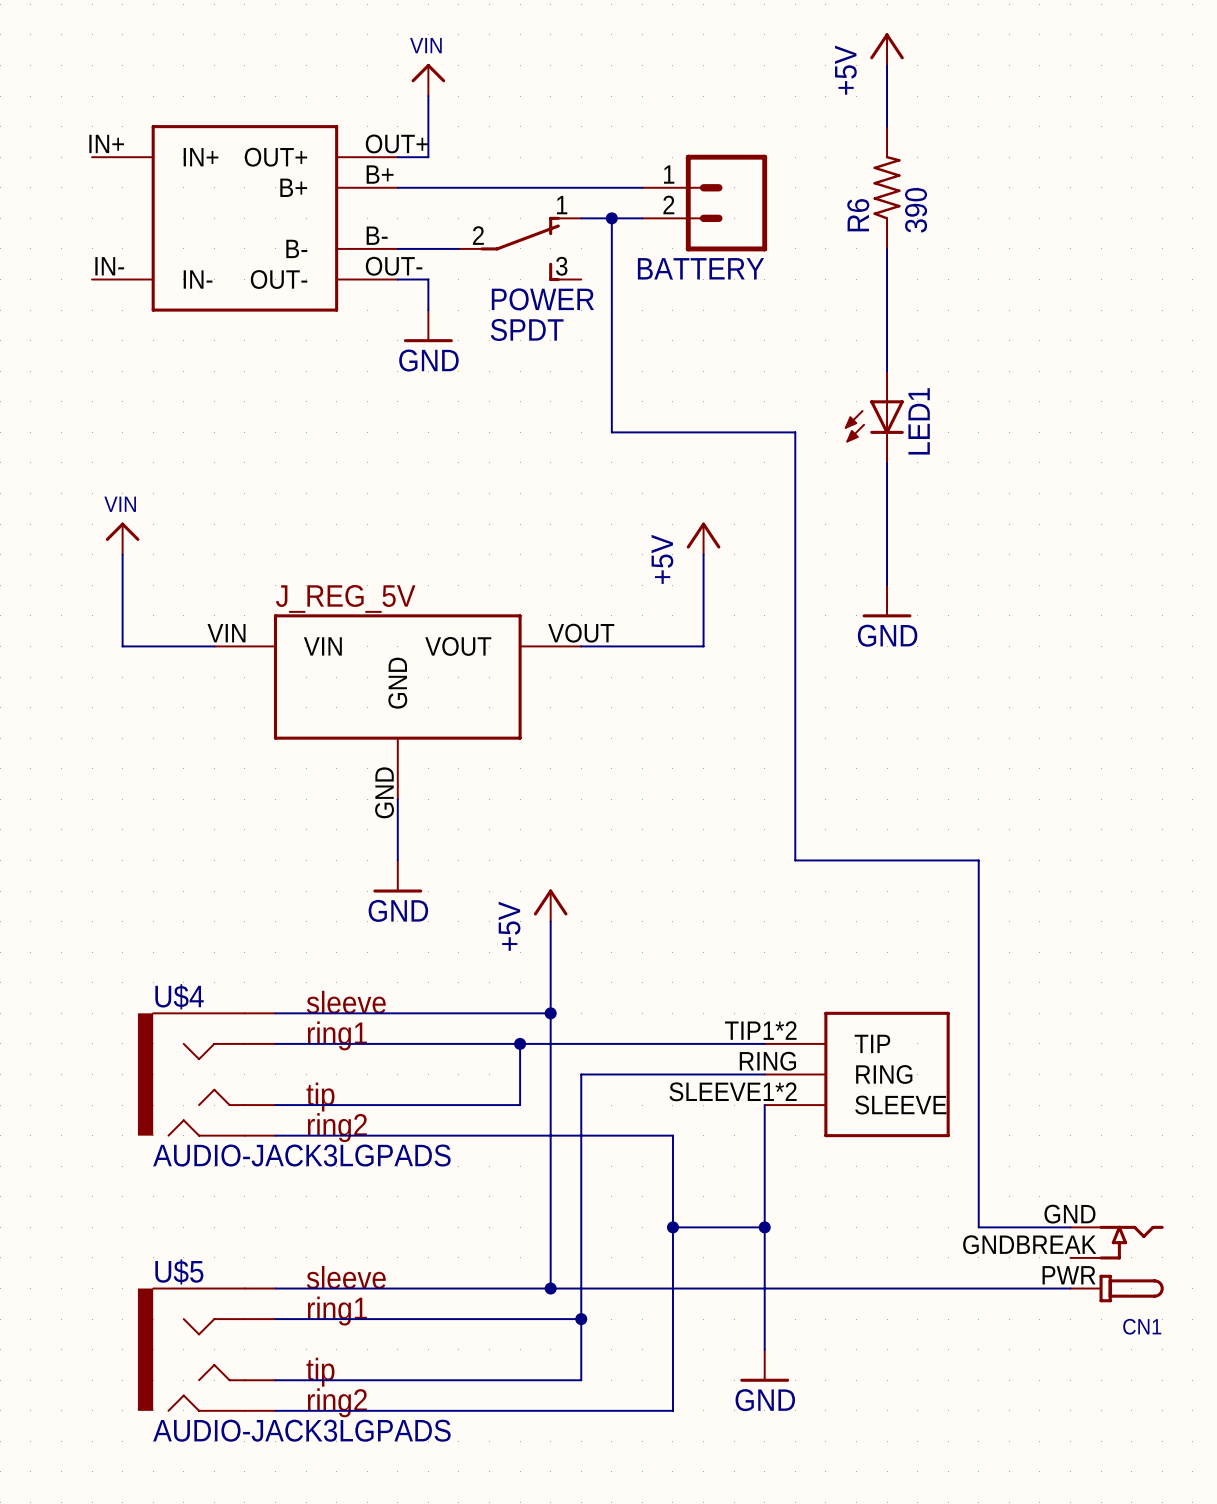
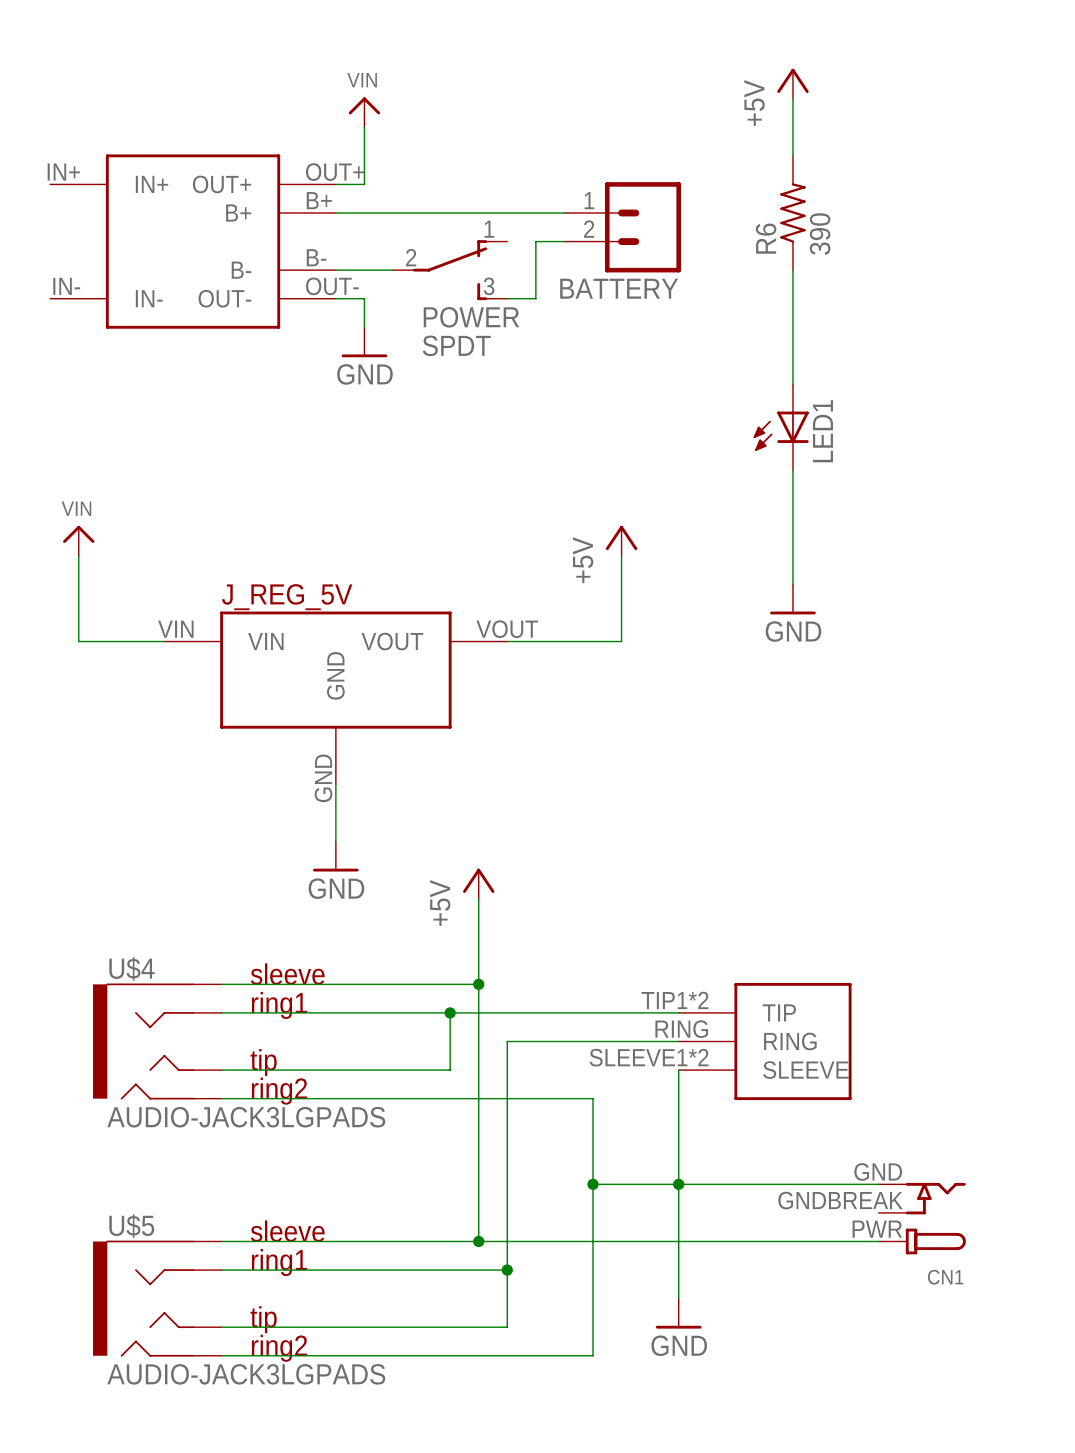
wire: (581, 218) (611, 218) -> none
junction: (611, 218) -> none
wire: (611, 279) (611, 432) (795, 432) (795, 860) (978, 860) (978, 1227) (1070, 1227) -> (535, 298) (507, 298)
wire: none -> (678, 1184) (878, 1184)
CN1 position: (1117, 1264) -> (922, 1218)
wire: (978, 1288) (1070, 1288) -> none

